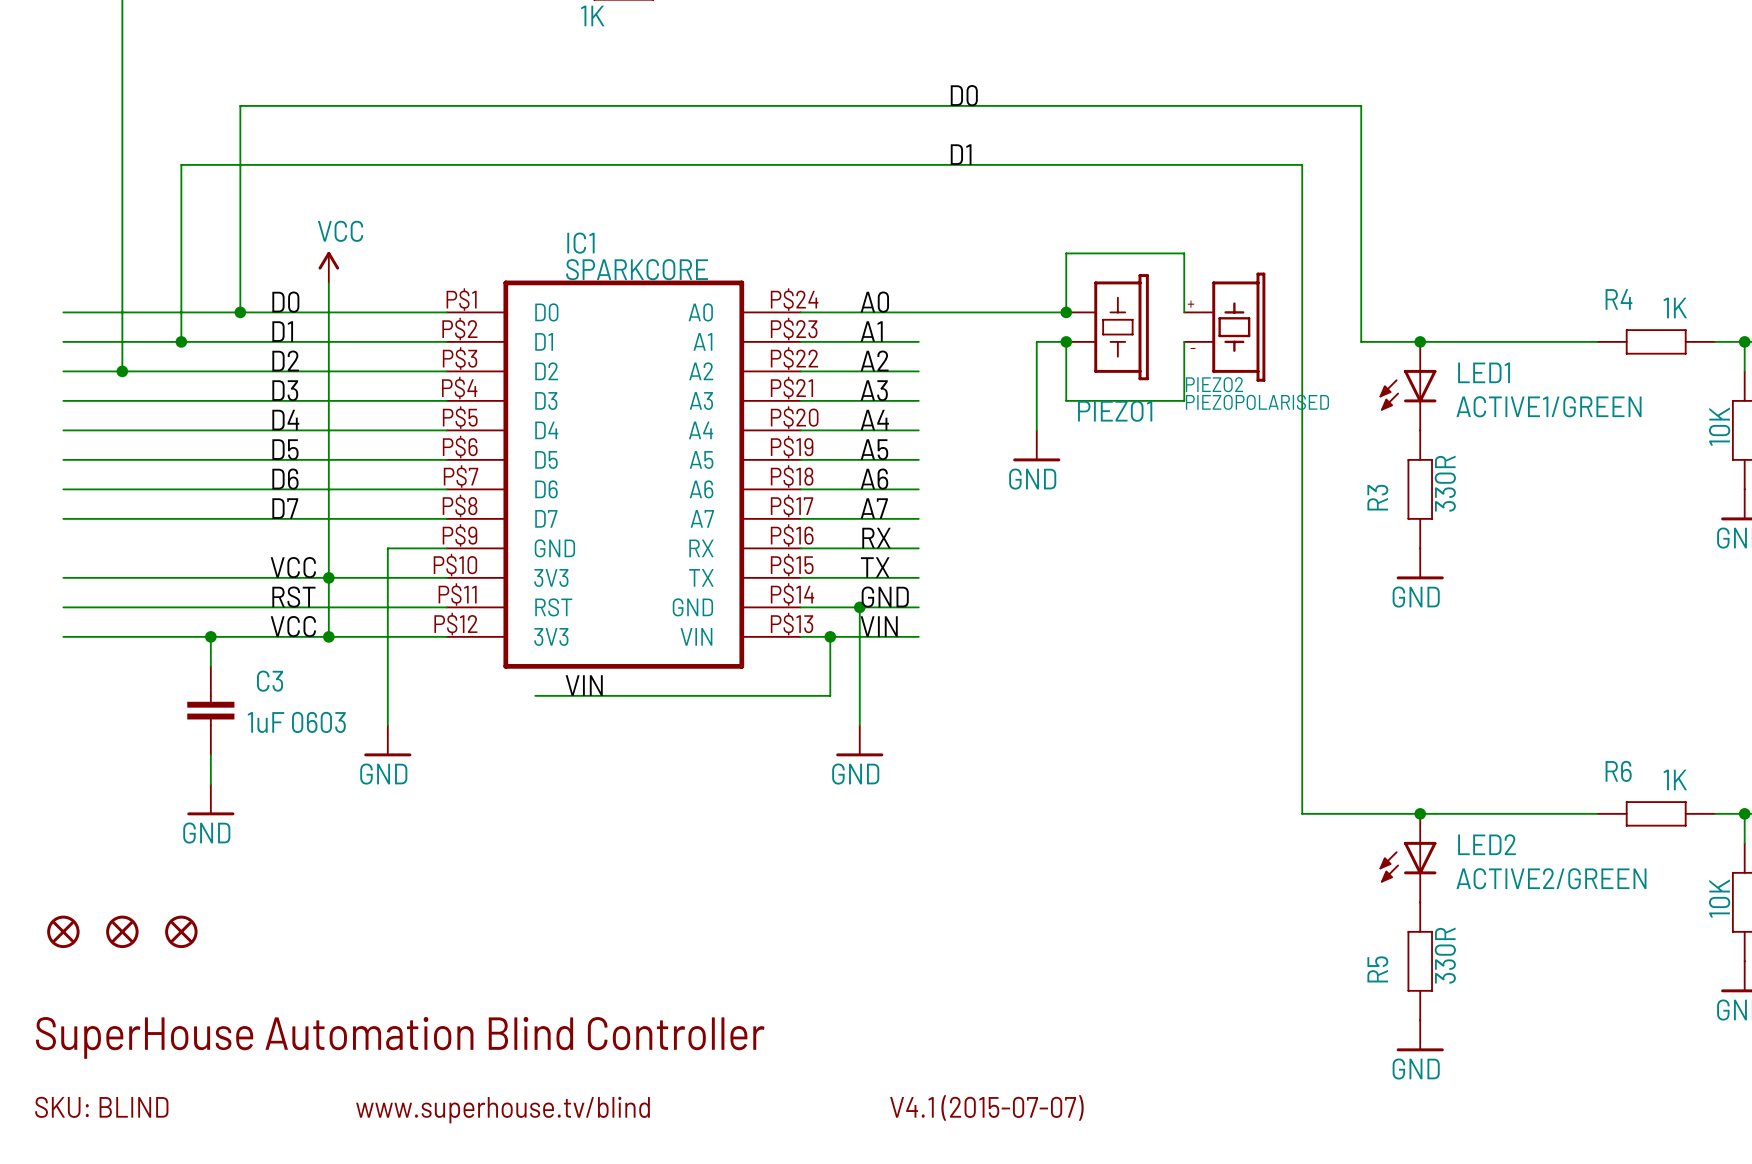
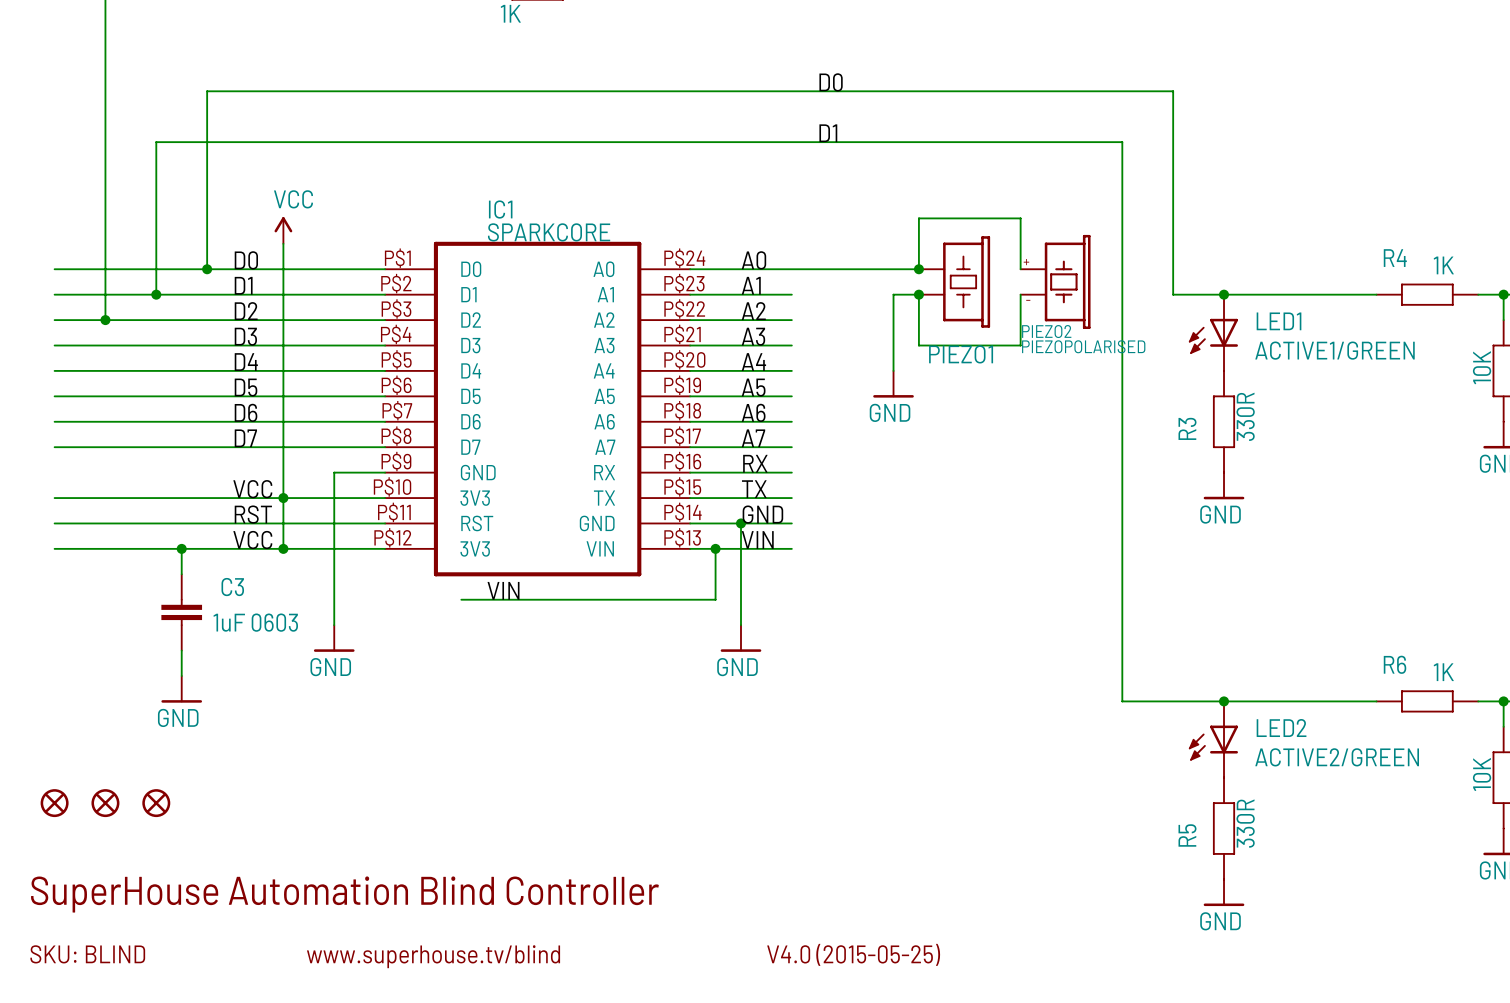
text: V4.1 (2015-07-07) (986, 1107) -> V4.0 (2015-05-25) (853, 954)

